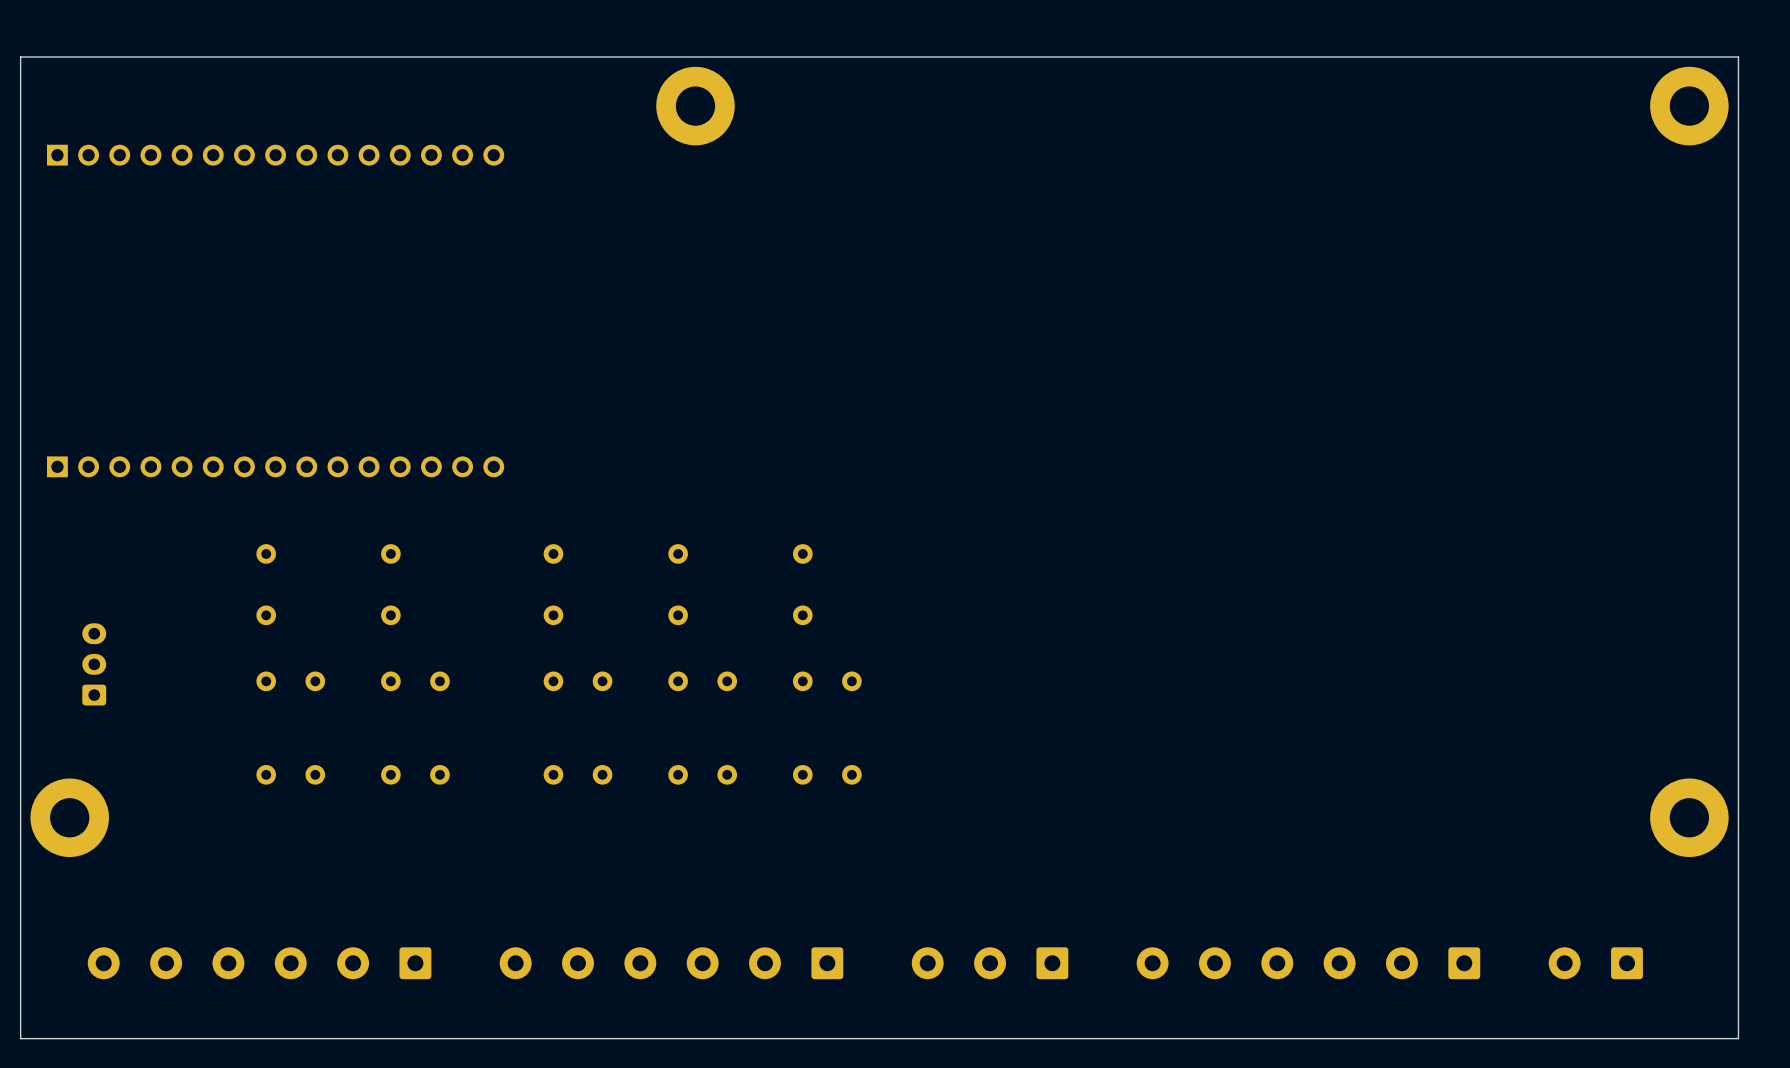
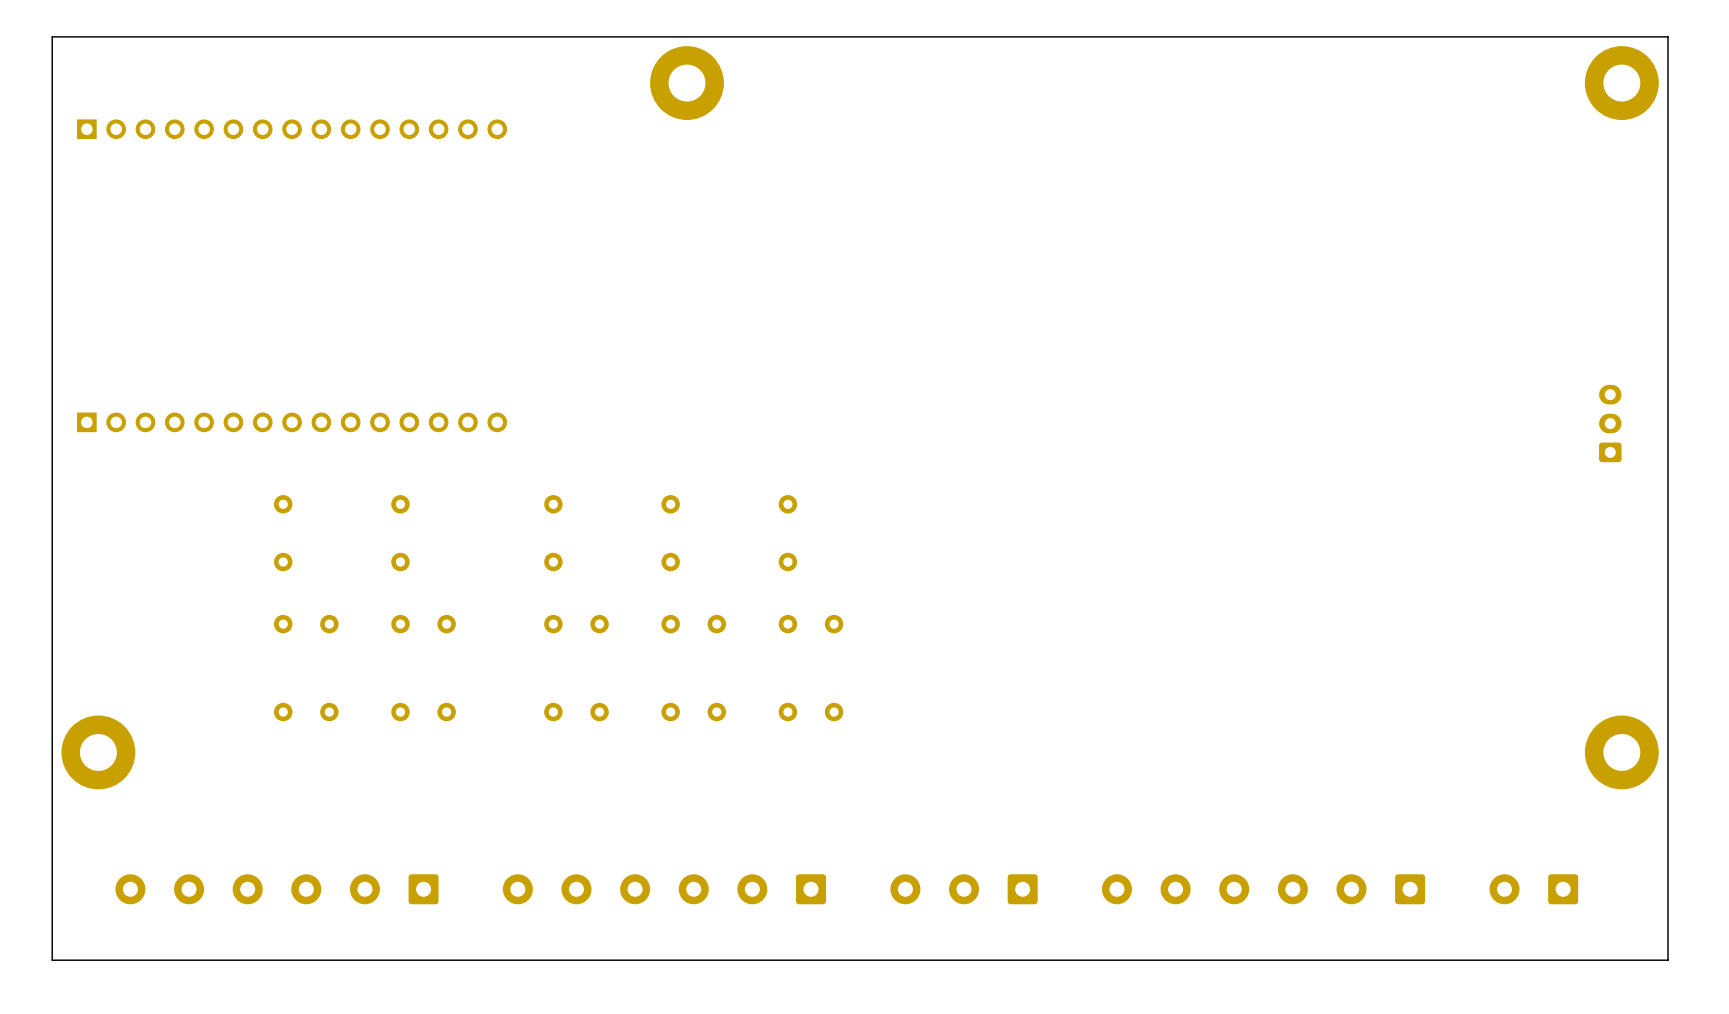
part: none -> (1610, 423)
part: (94, 664) -> none

